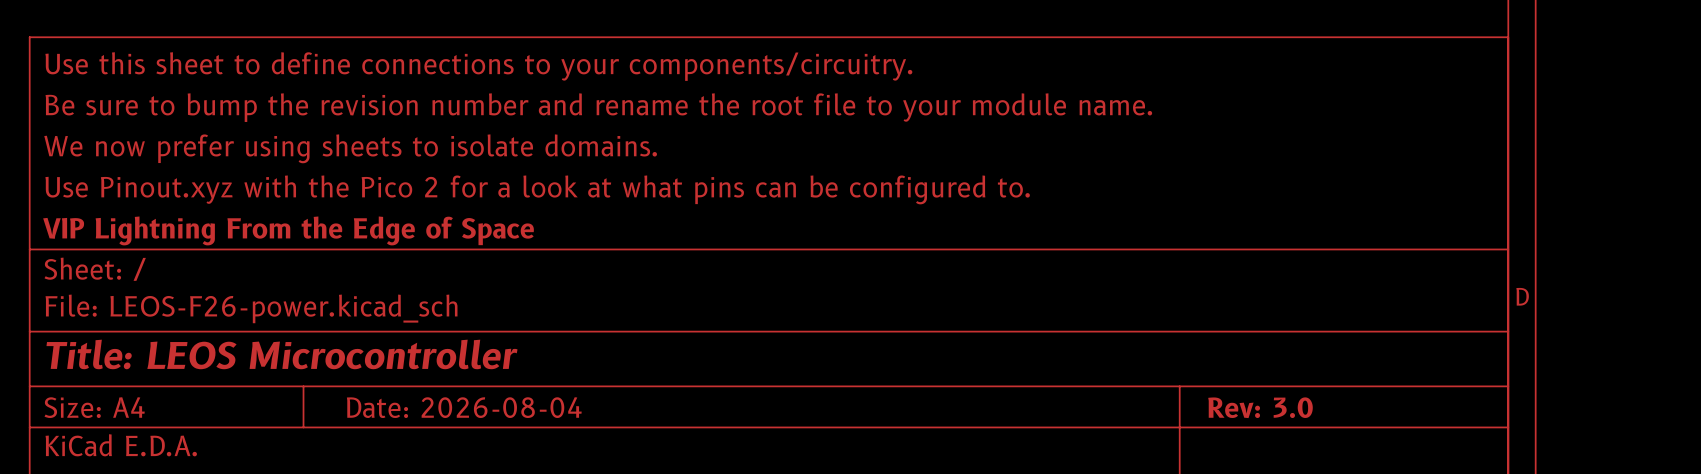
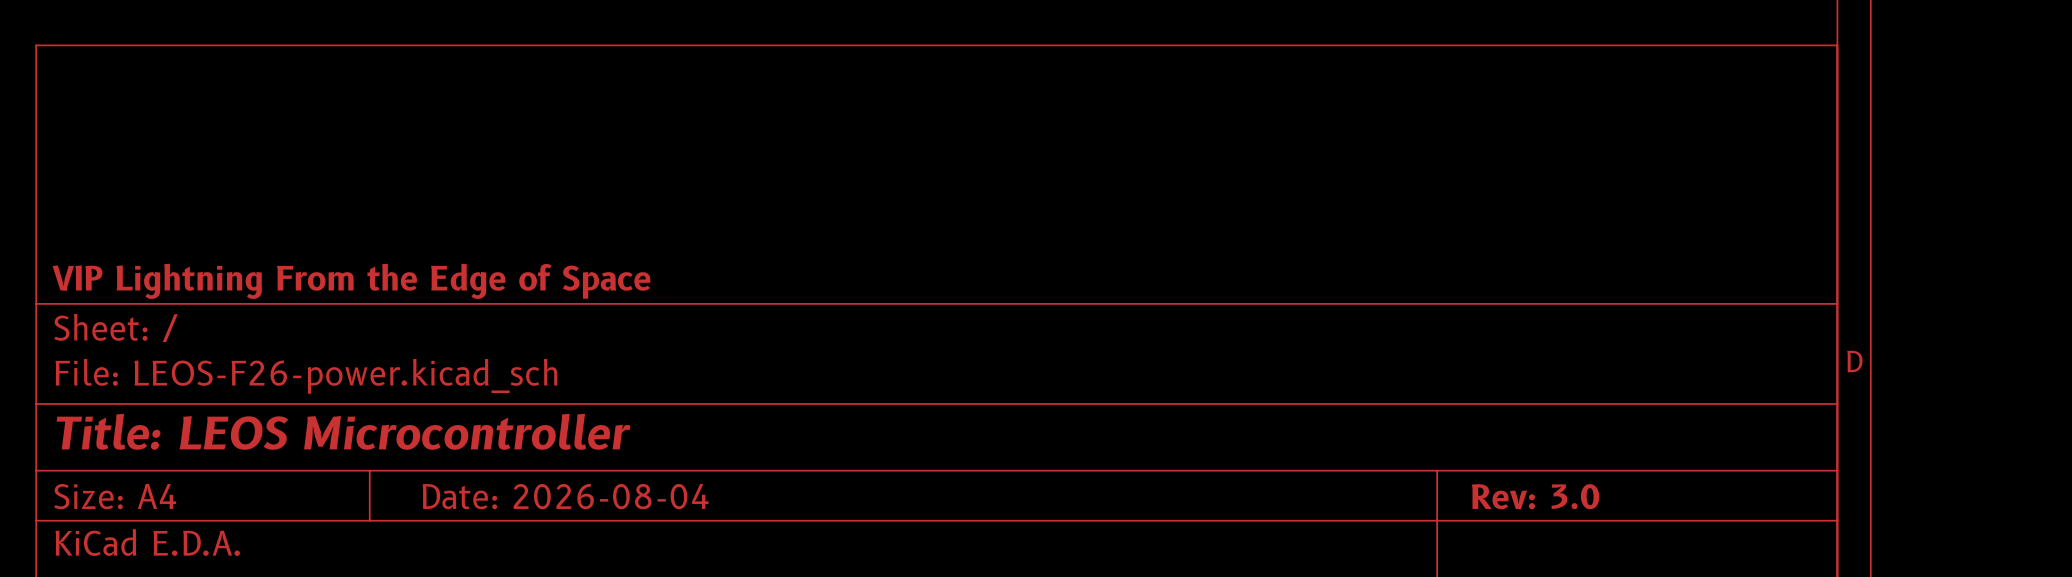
title block: Use this sheet to define connections to your components/circuitry. (478, 66) -> none
title block: Be sure to bump the revision number and rename the root file to your module name. (598, 107) -> none
title block: We now prefer using sheets to isolate domains. (350, 148) -> none
title block: Use Pinout.xyz with the Pico 2 for a look at what pins can be configured to. (537, 189) -> none

